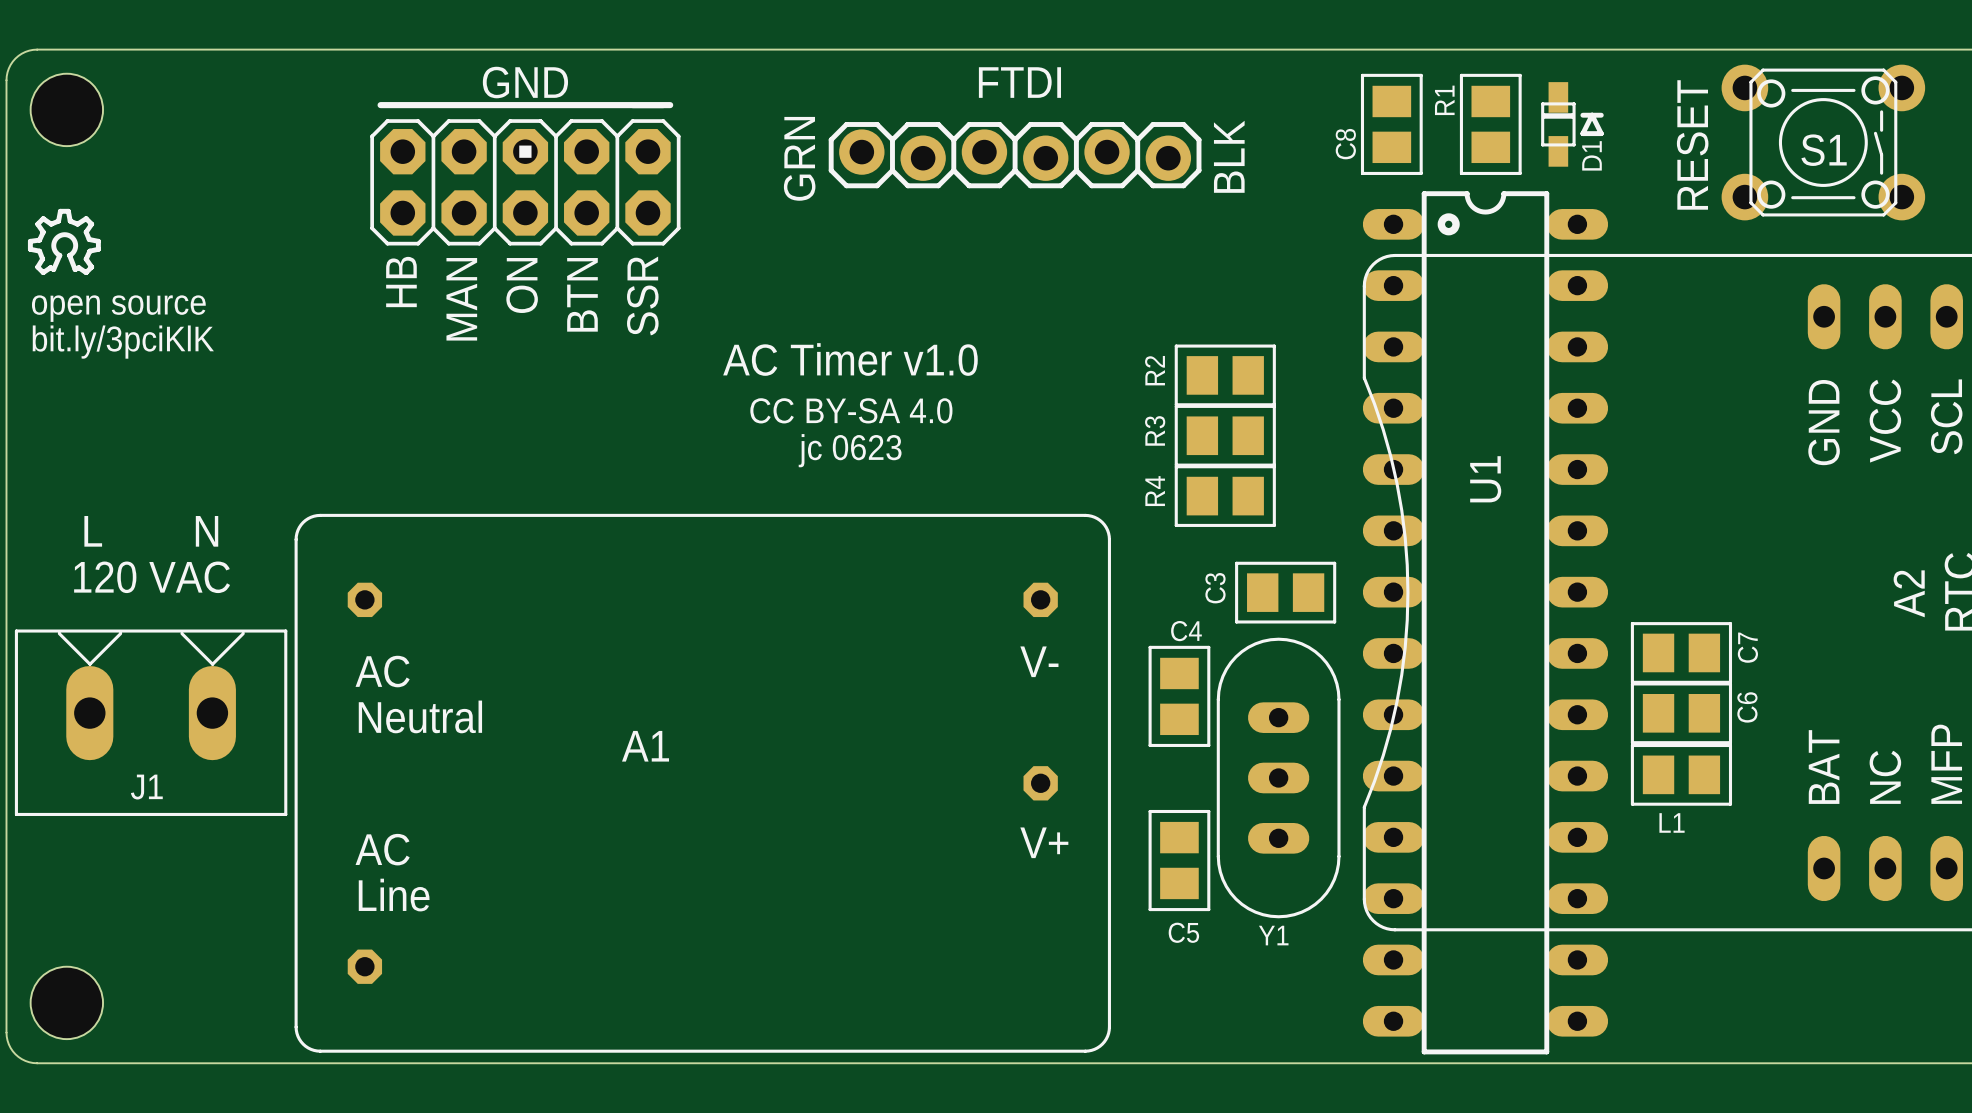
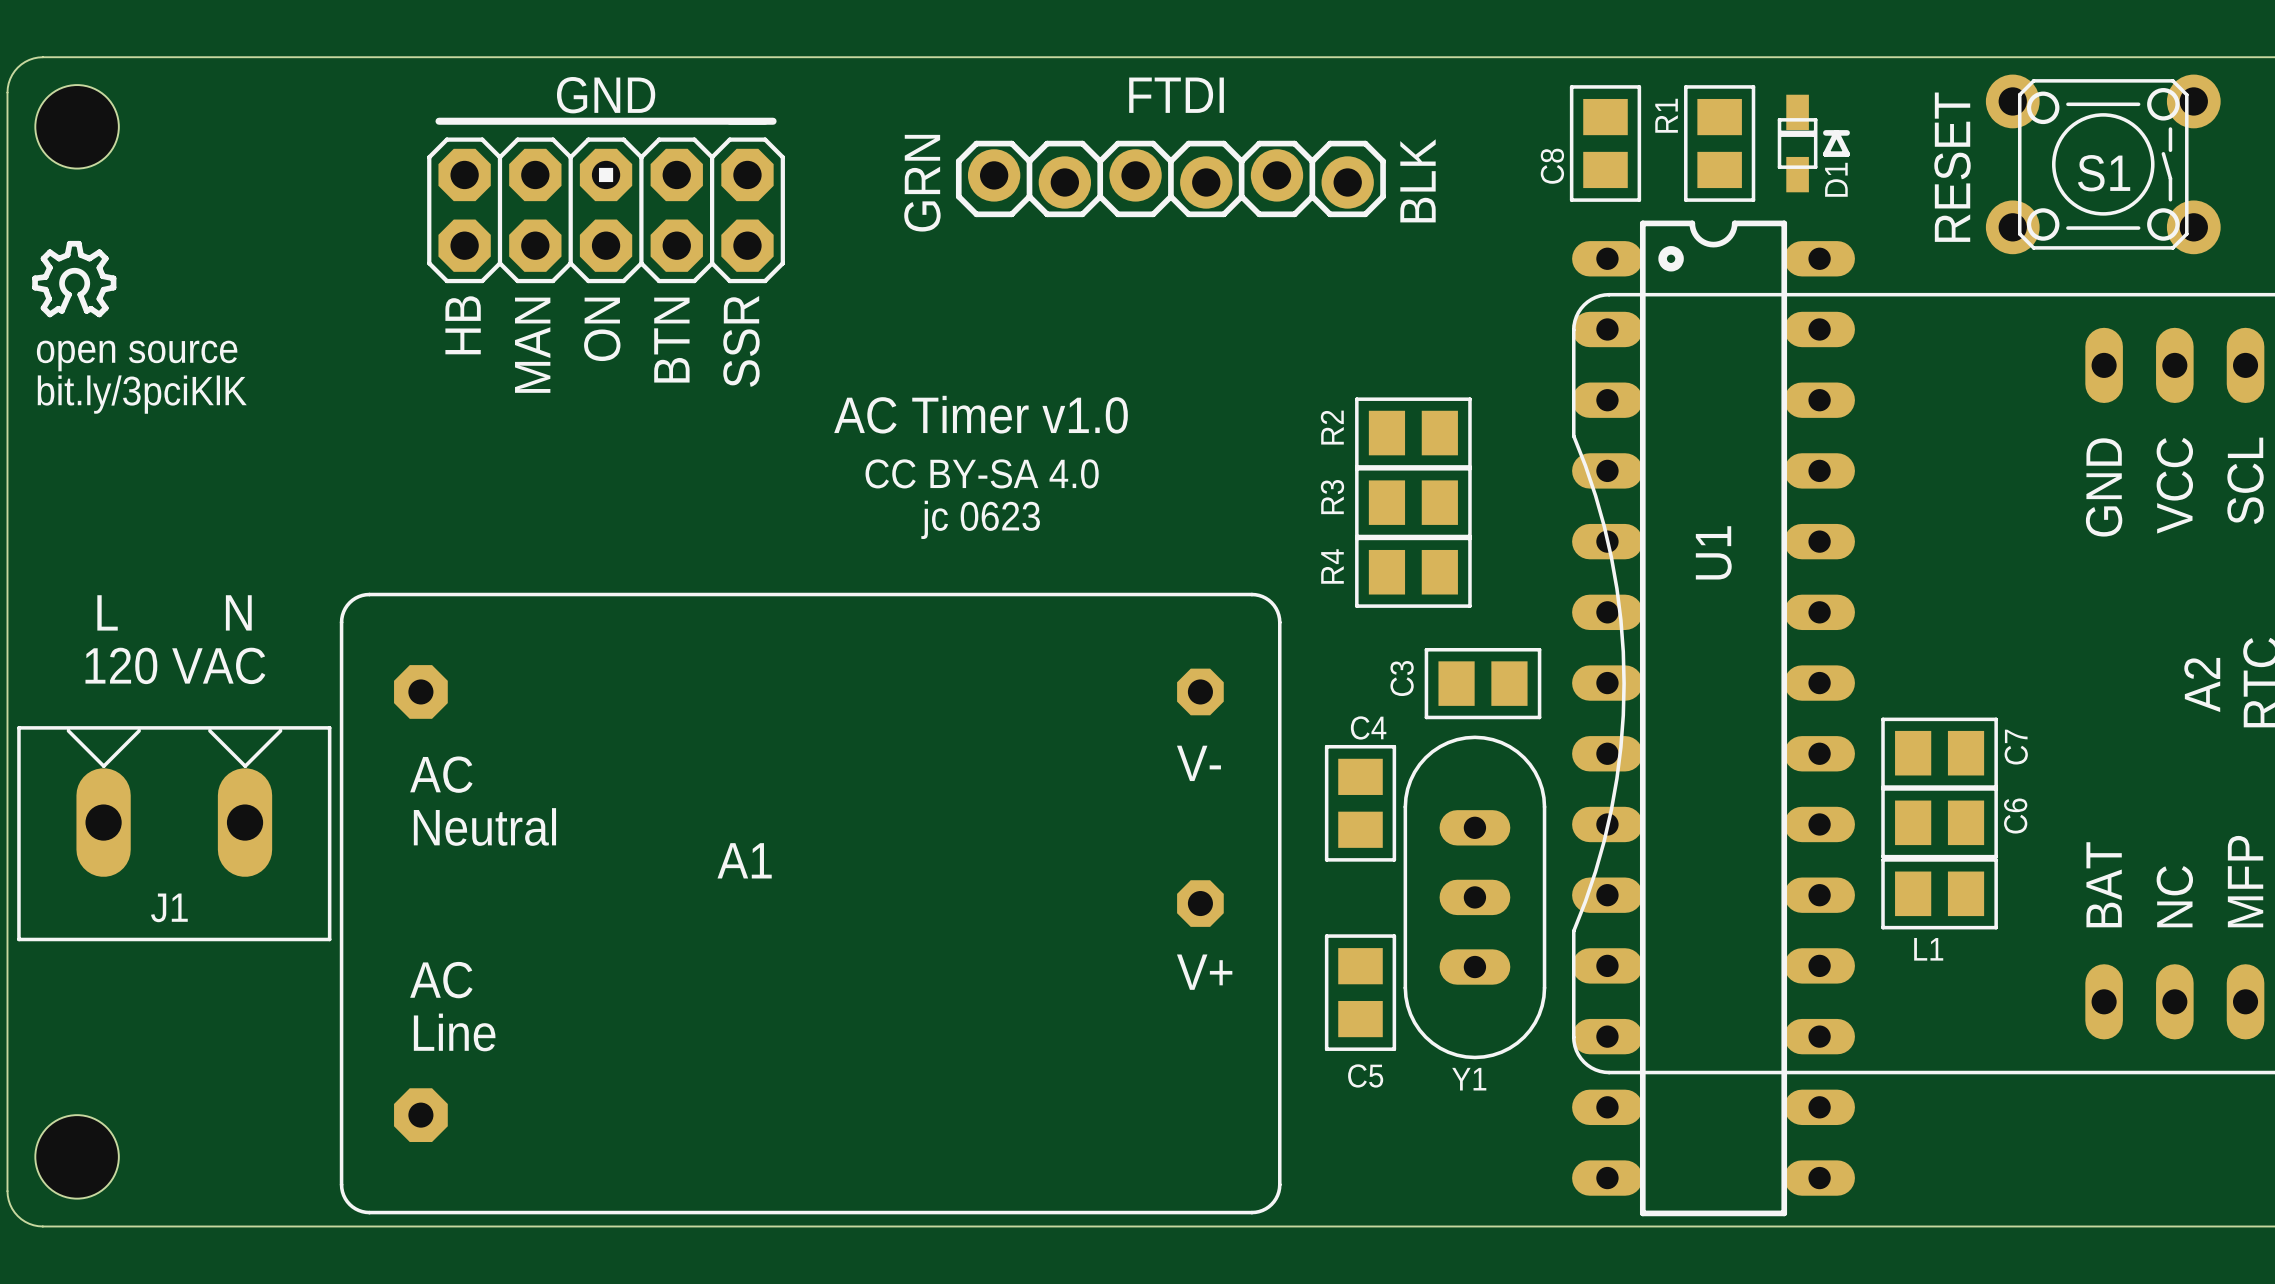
A1 footprint: [294, 513, 1111, 1053] -> [339, 592, 1282, 1215]

